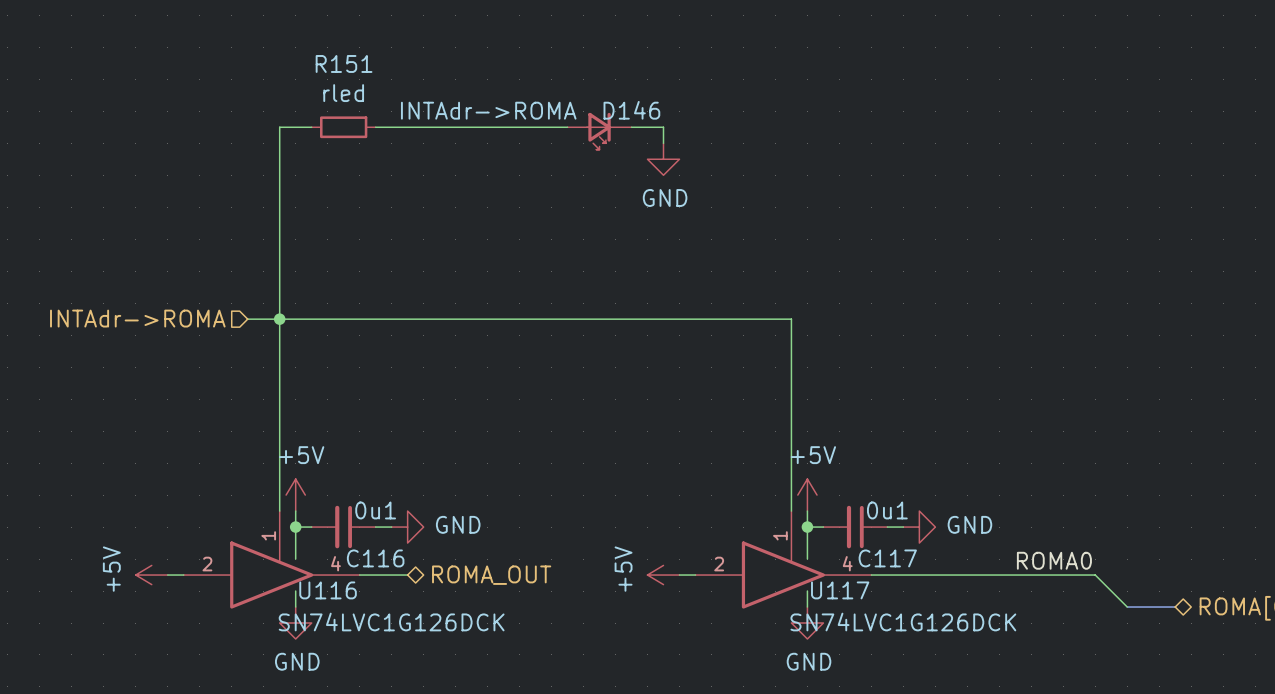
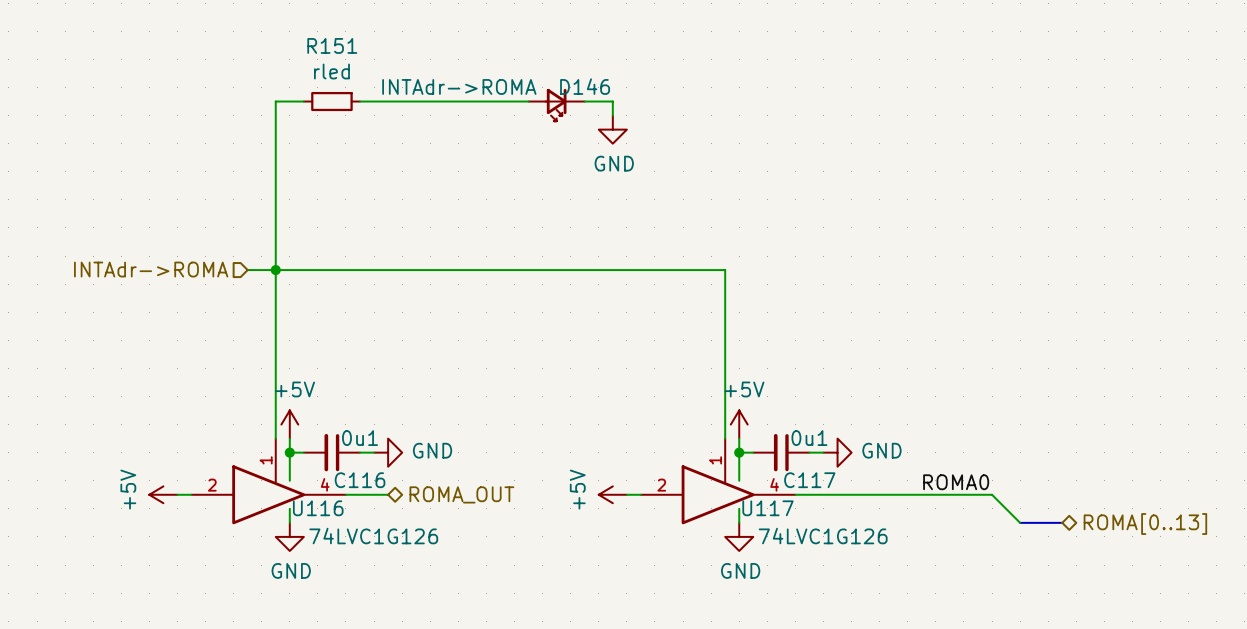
U116 value: SN74LVC1G126DCK (391, 622) -> 74LVC1G126 (373, 536)
U117 value: SN74LVC1G126DCK (903, 622) -> 74LVC1G126 (823, 536)

